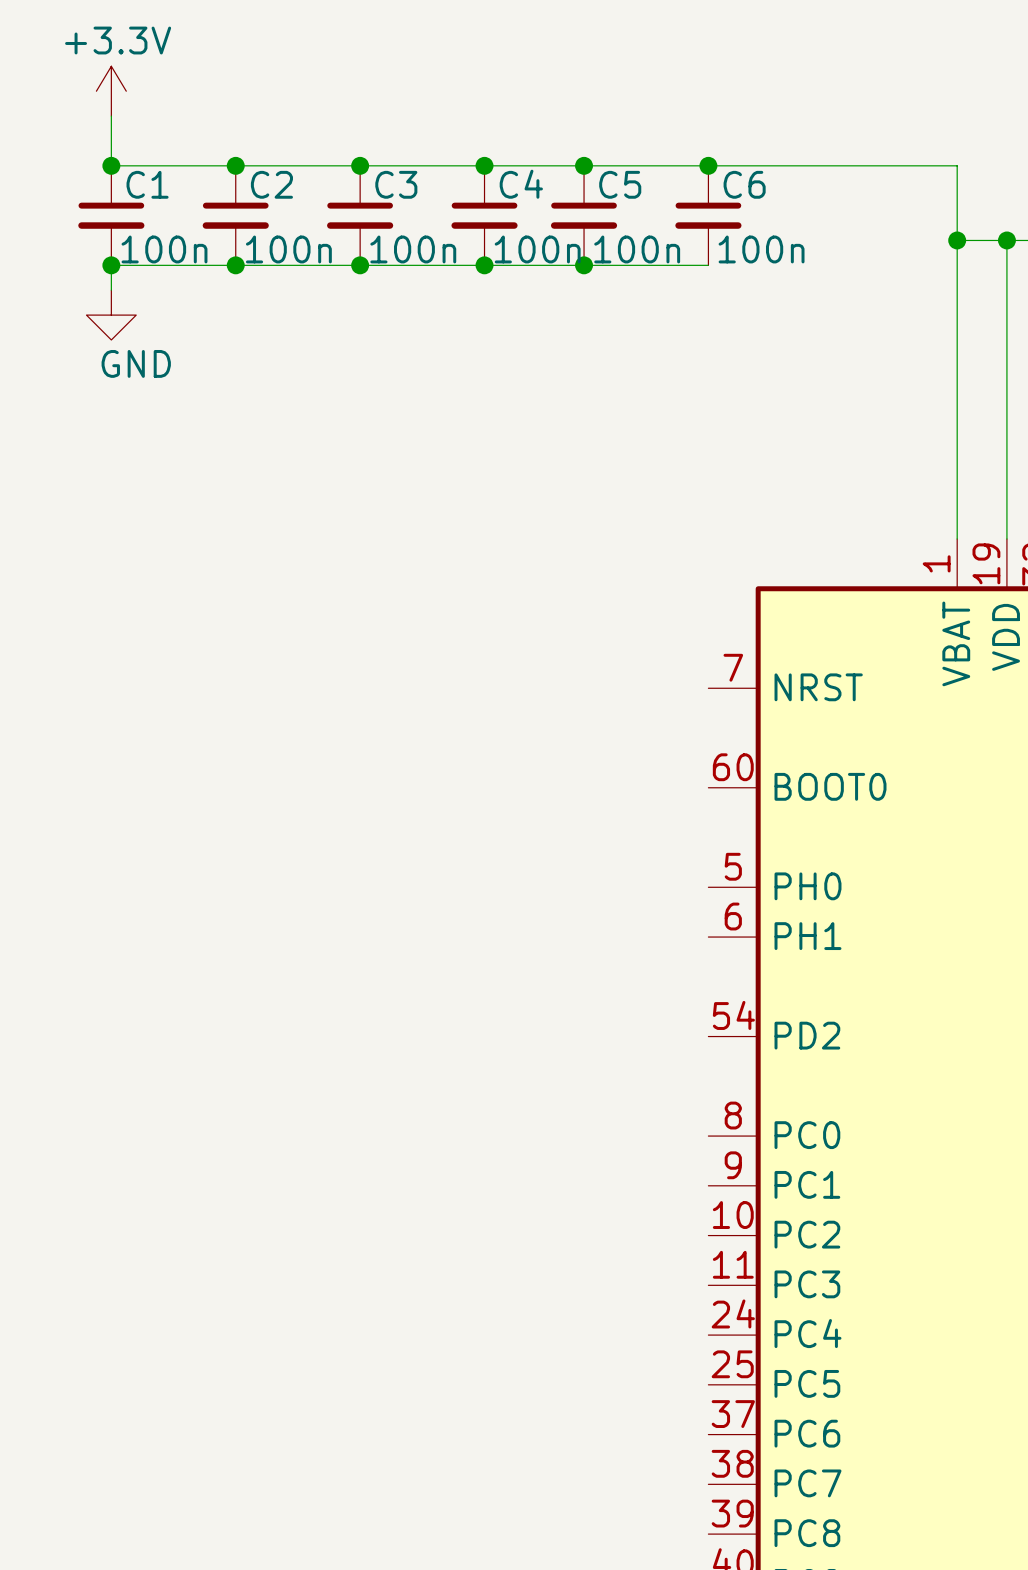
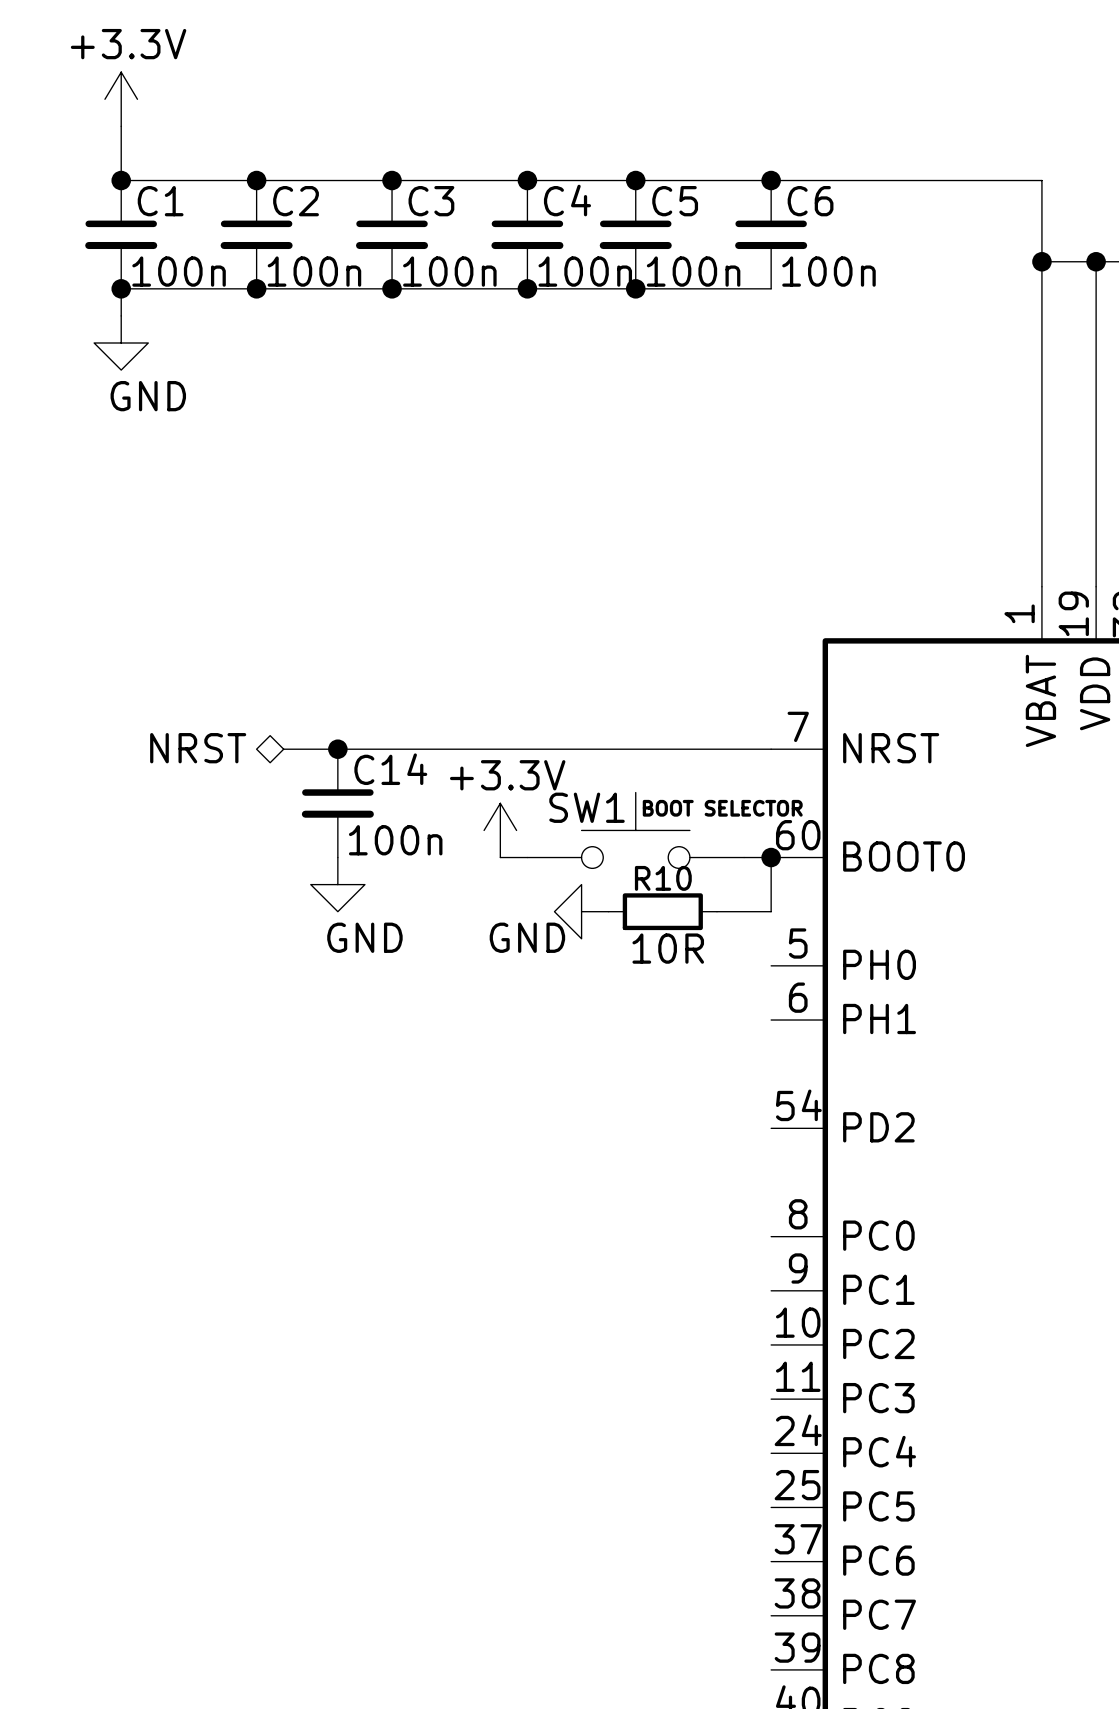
hierarchical label: none -> NRST (198, 748)
wire: none -> (283, 749) (771, 749)
junction: none -> (337, 749)
C14: none -> 100n (337, 803)
power symbol: none -> +3.3V (500, 830)
SW1: none -> BOOT SELECTOR (635, 830)
wire: none -> (500, 857) (527, 857)
wire: none -> (744, 857) (771, 857) (771, 911) (716, 911)
junction: none -> (771, 857)
power symbol: none -> GND (337, 884)
power symbol: none -> GND (581, 911)
R10: none -> 10R (662, 911)

